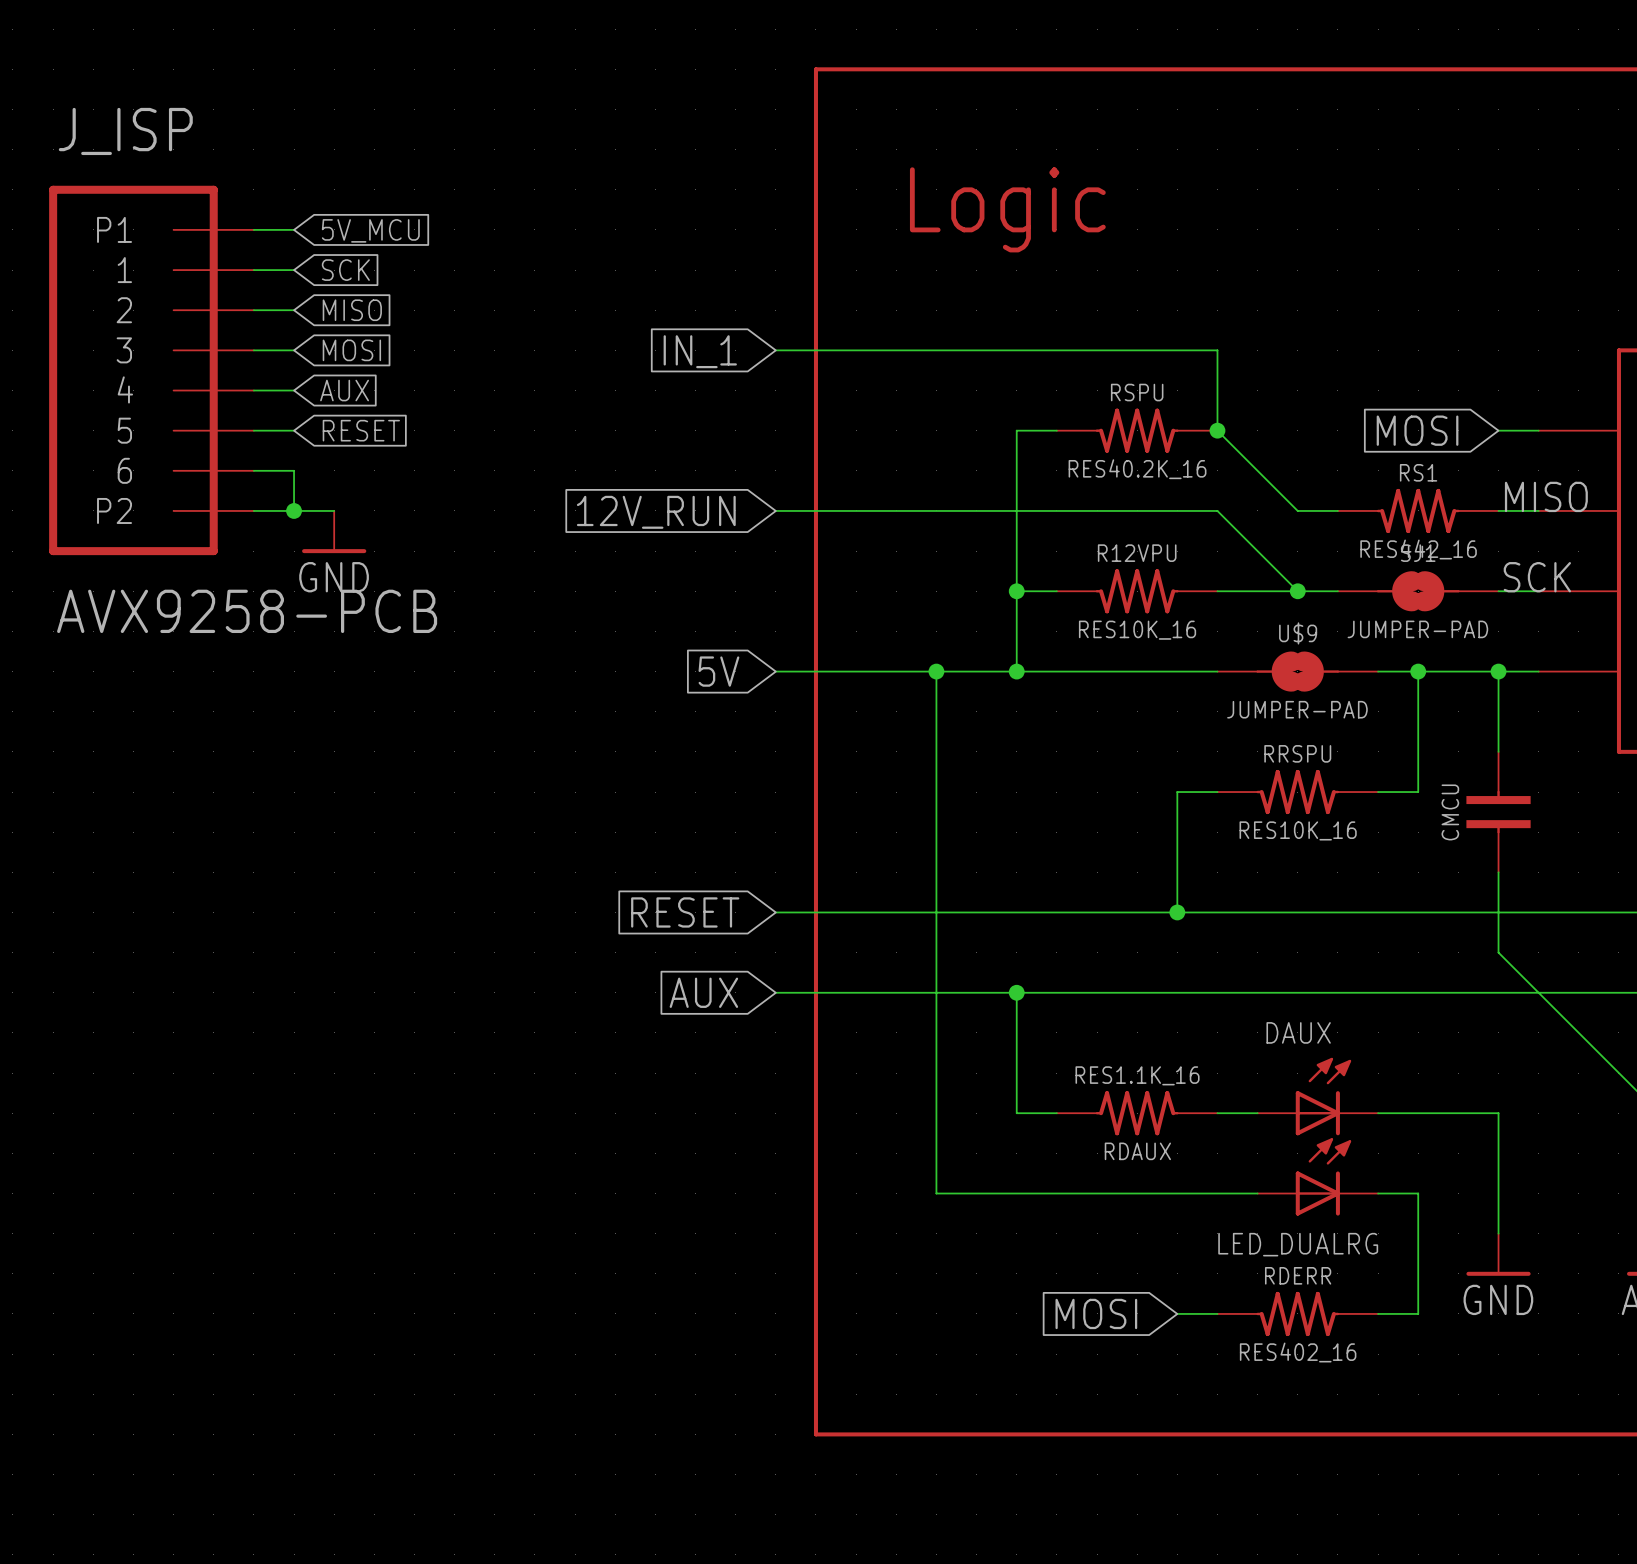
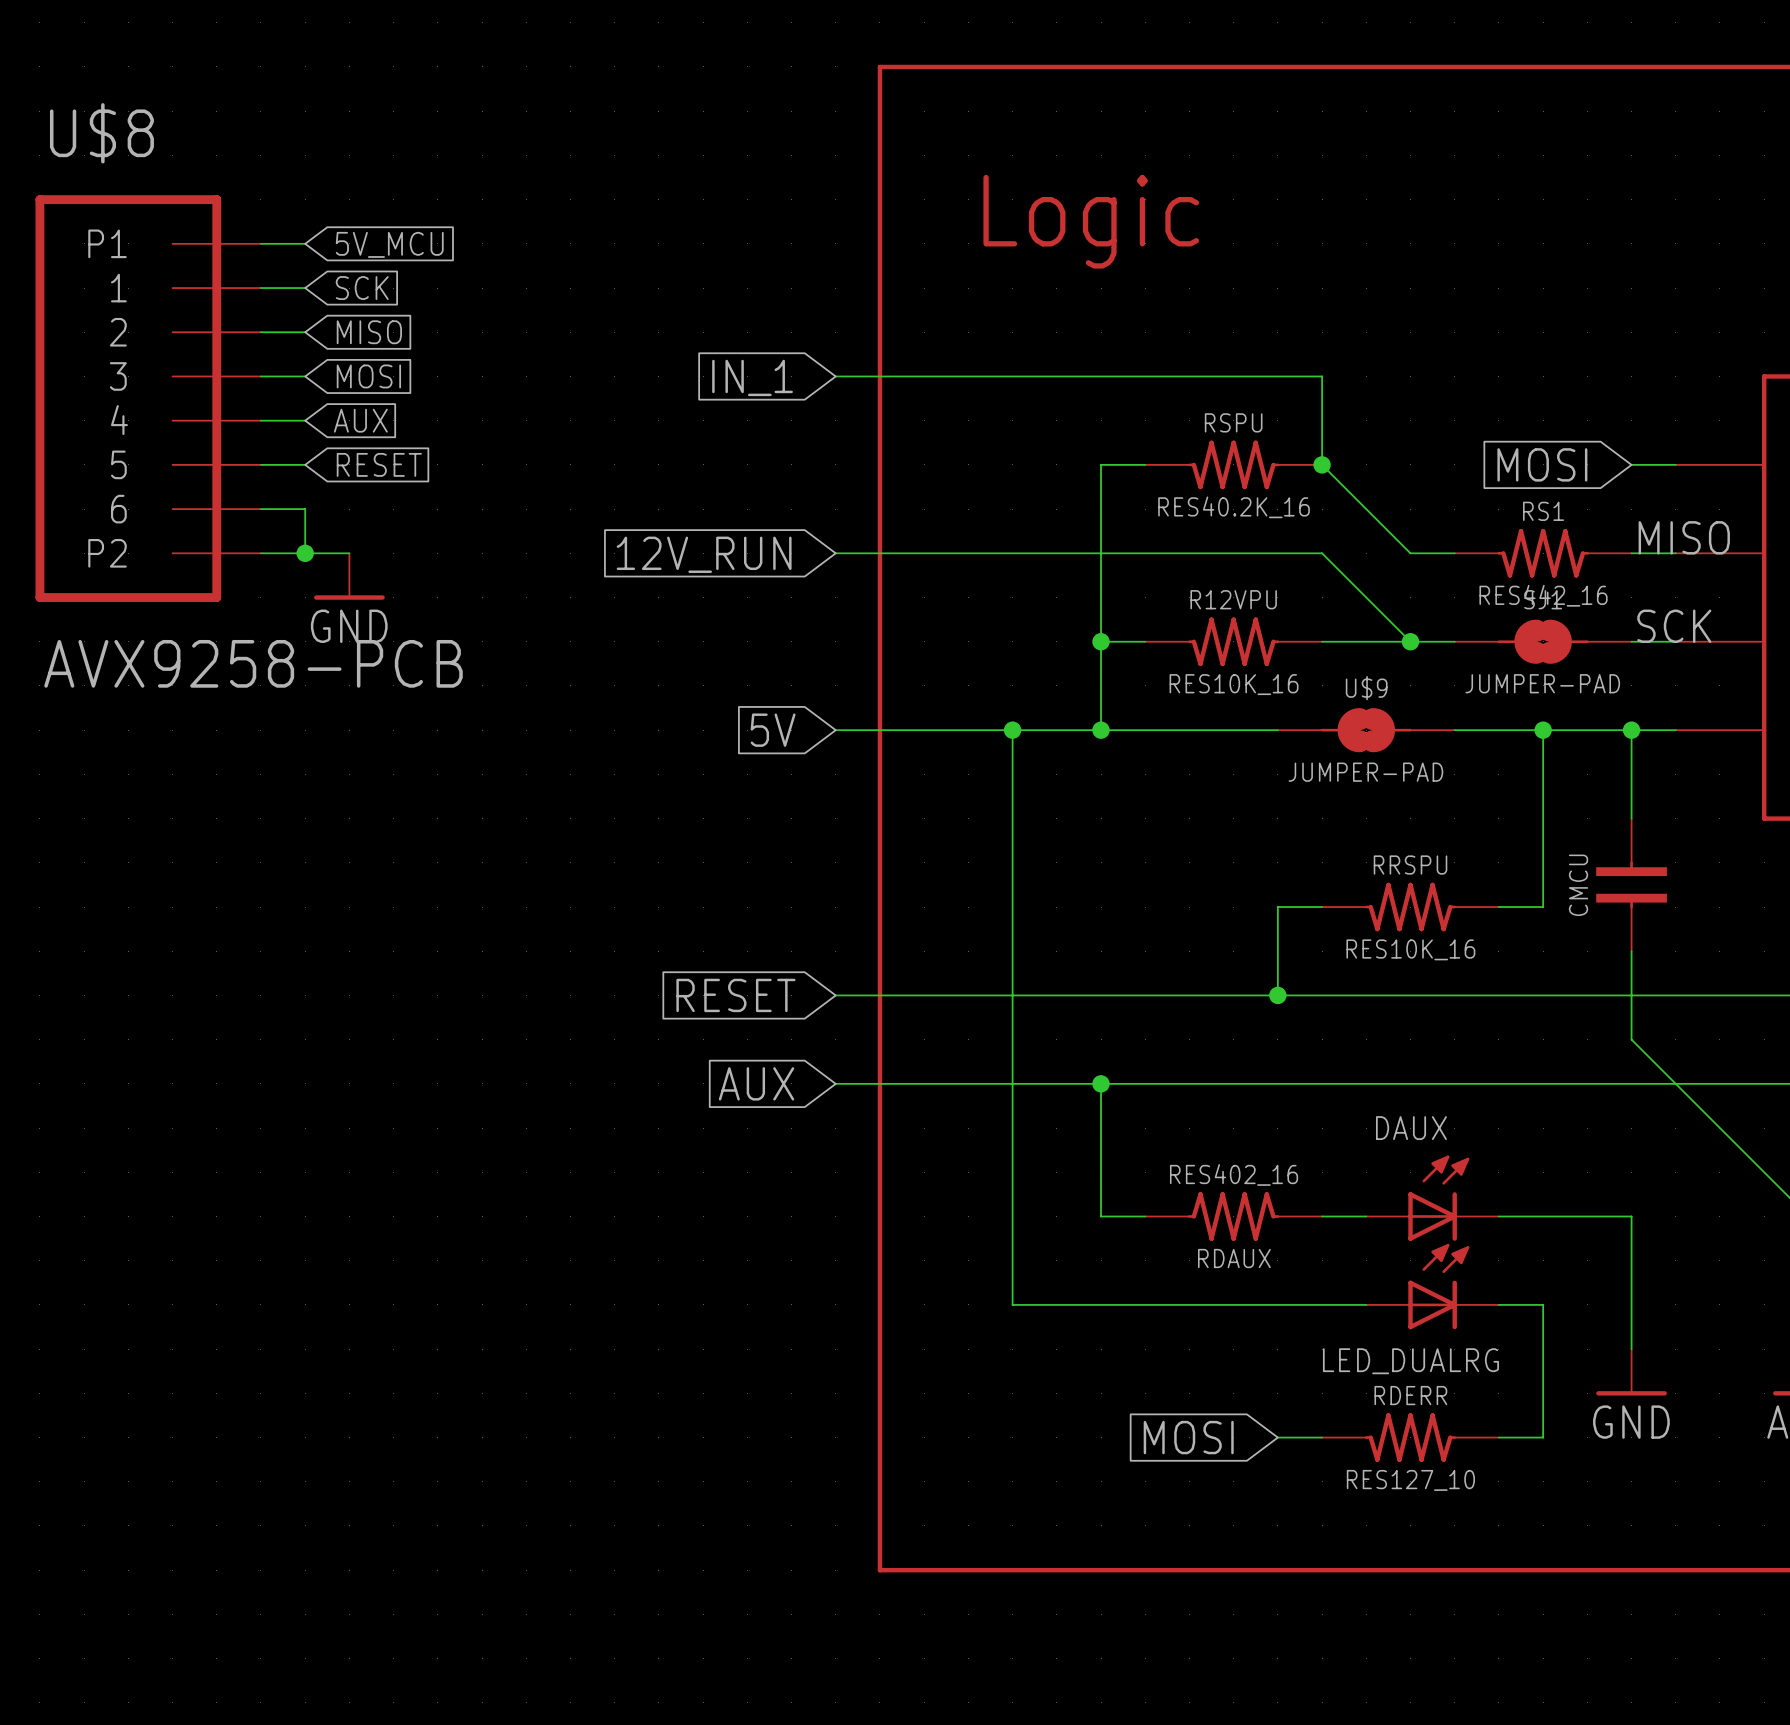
J_ISP name: J_ISP (125, 131) -> U$8 (101, 133)
U$9 position: (1297, 671) -> (1366, 730)
wire: (1217, 792) (1177, 792) (1177, 832) -> (1322, 907) (1277, 907)
RRSPU position: (1297, 792) -> (1410, 907)
wire: (1378, 792) (1418, 792) -> (1498, 907) (1543, 907) (1543, 862)
RDAUX value: RES1.1K_16 (1137, 1075) -> RES402_16 (1234, 1174)
RDERR value: RES402_16 (1298, 1352) -> RES127_10 (1410, 1480)

